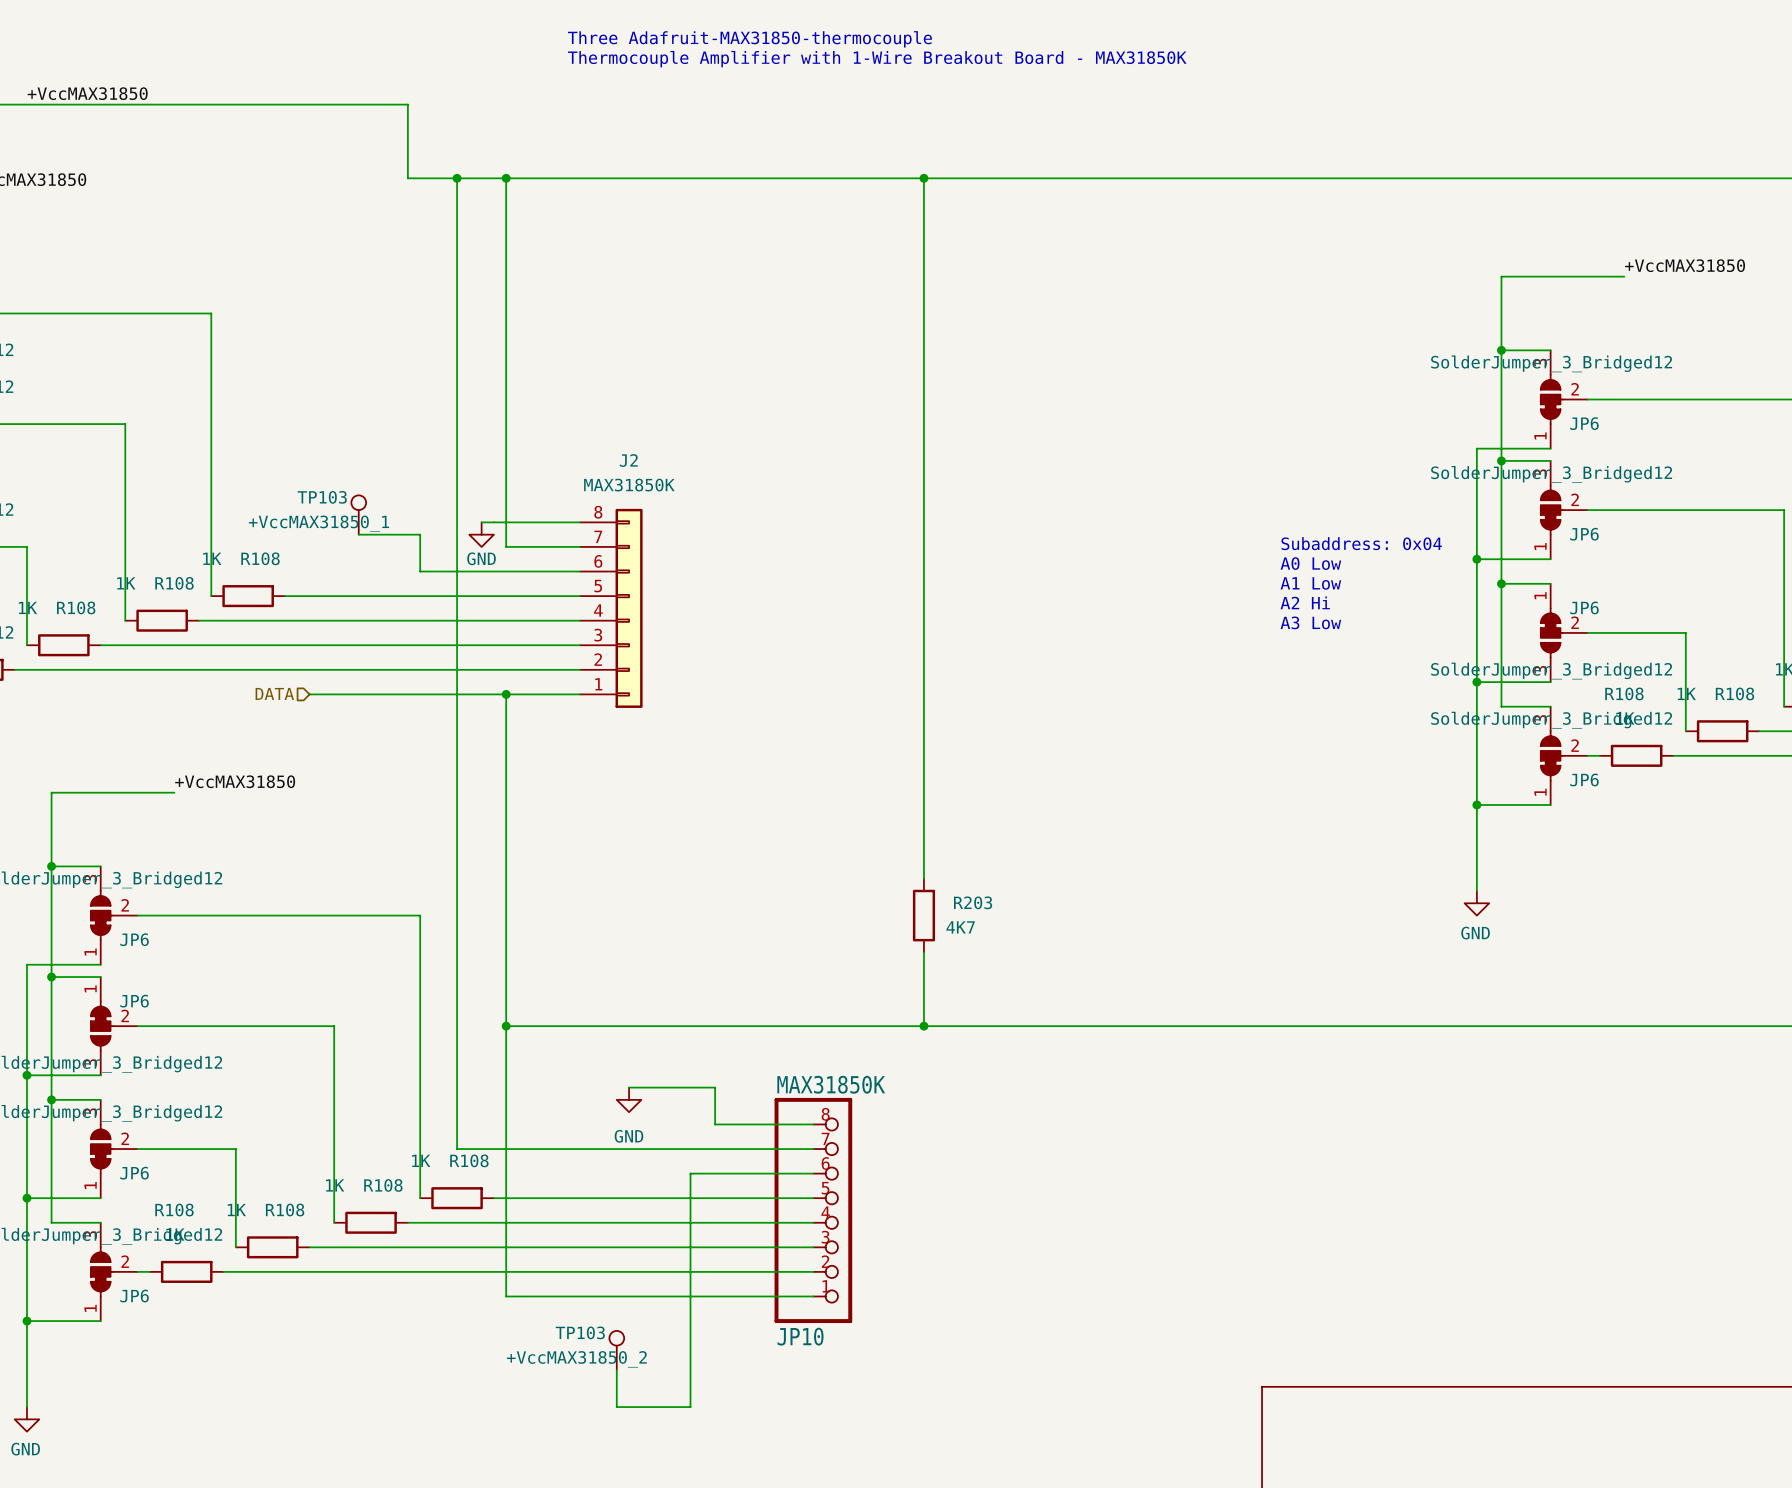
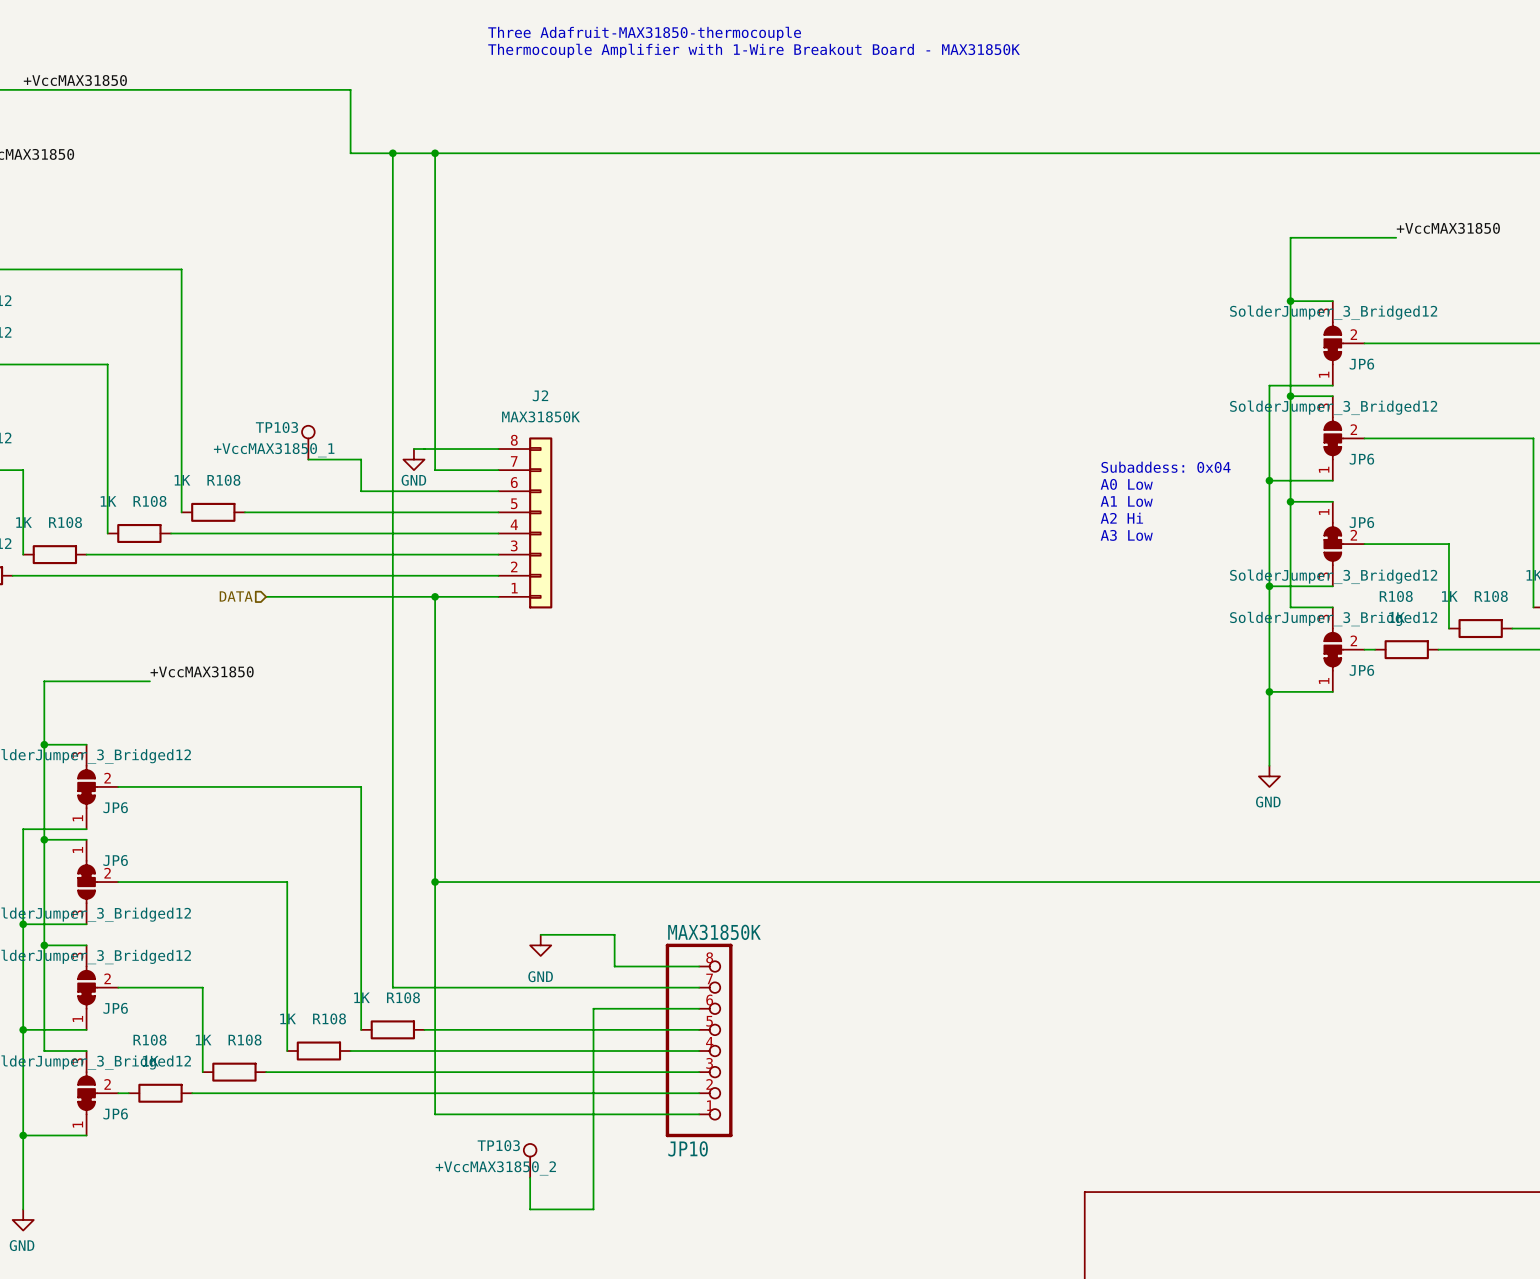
wire: (923, 178) (923, 878) -> none
junction: (923, 178) -> none
text: Subaddress: 0x04 (1361, 543) -> Subaddess: 0x04 (1166, 467)
R203: 4K7 (923, 915) -> none
wire: (923, 952) (923, 1026) -> none
junction: (923, 1026) -> none

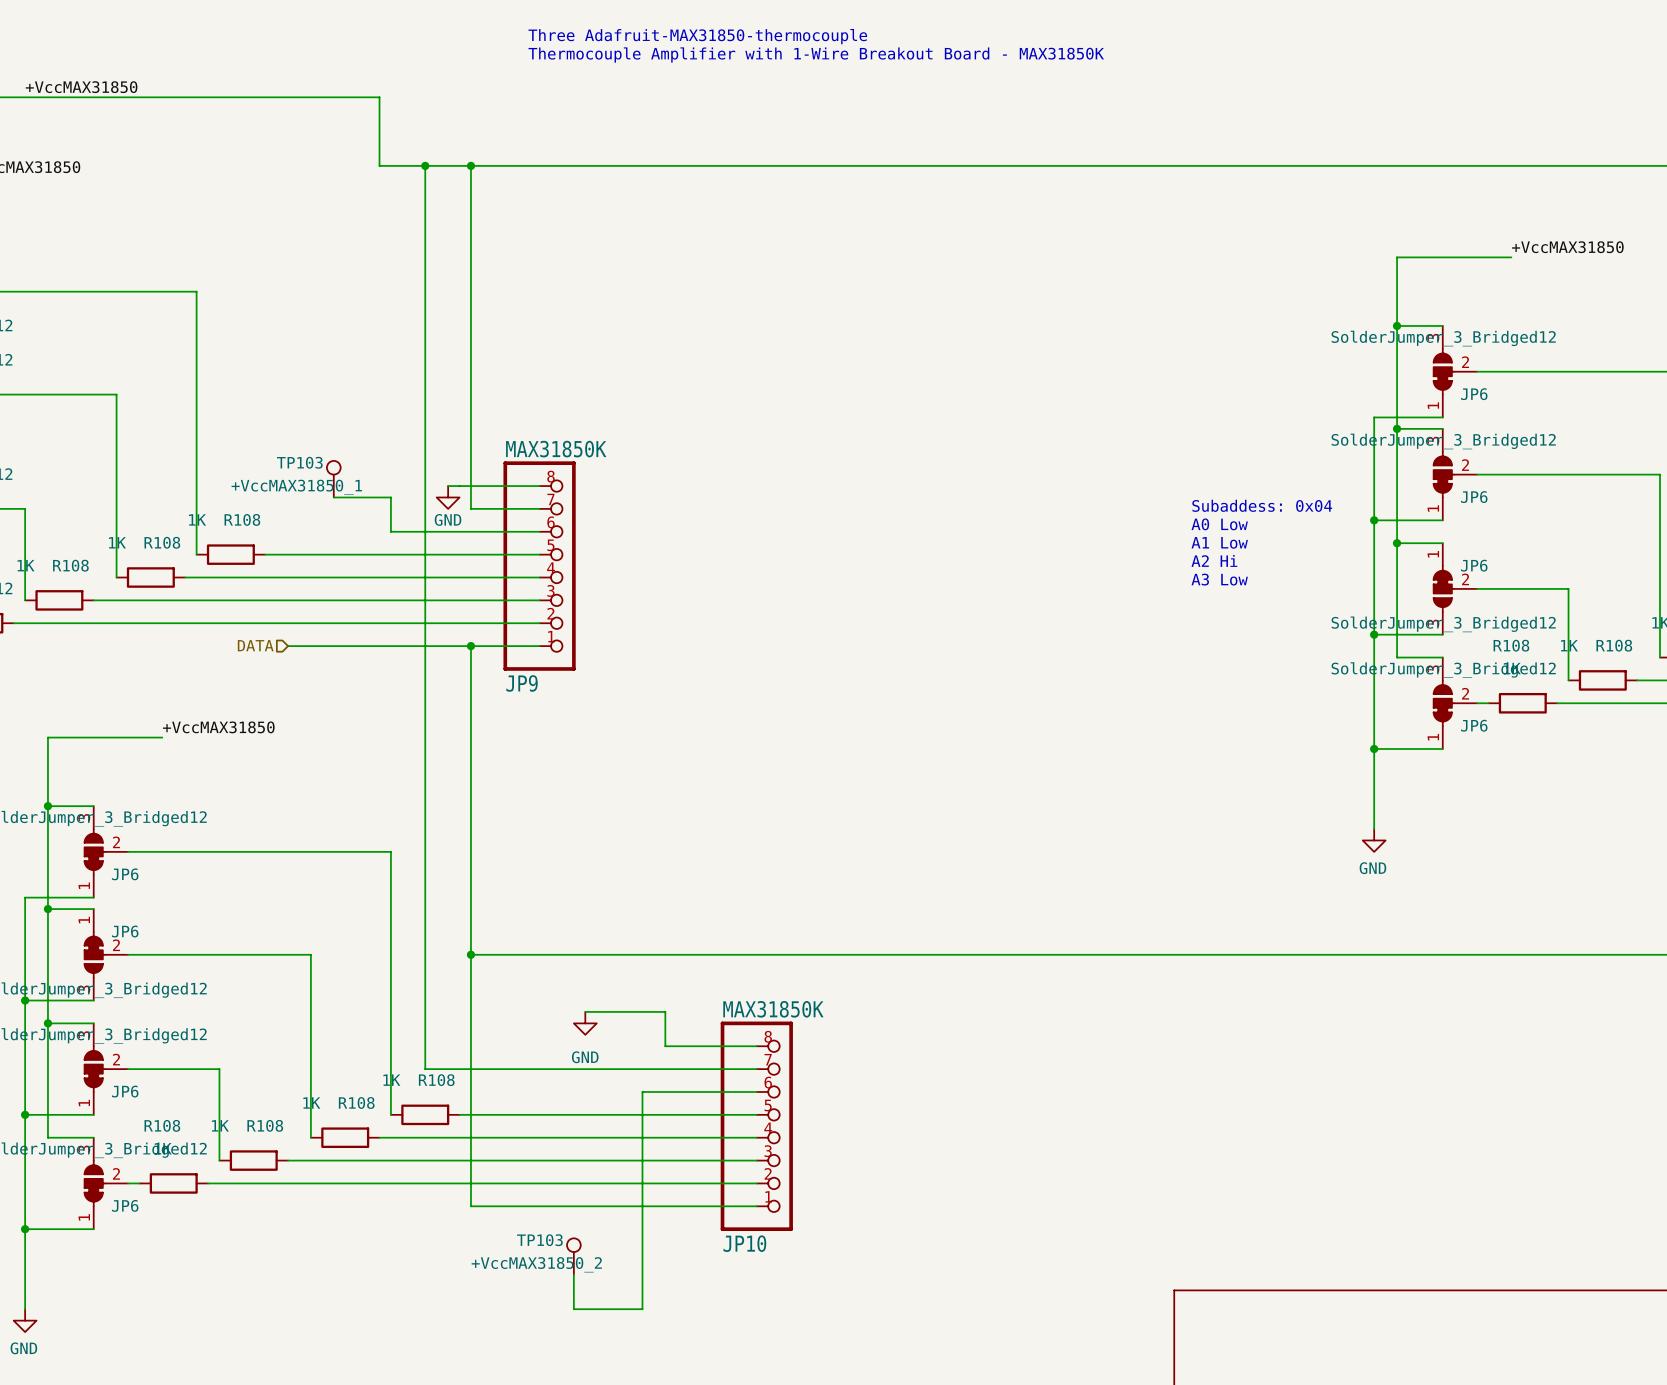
JP9: none -> MAX31850K (539, 566)
J2: MAX31850K (525, 522) -> none

